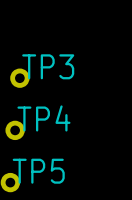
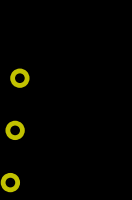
TP3 name: TP3 (48, 66) -> none
TP4 name: TP4 (43, 118) -> none
TP5 name: TP5 (38, 171) -> none

